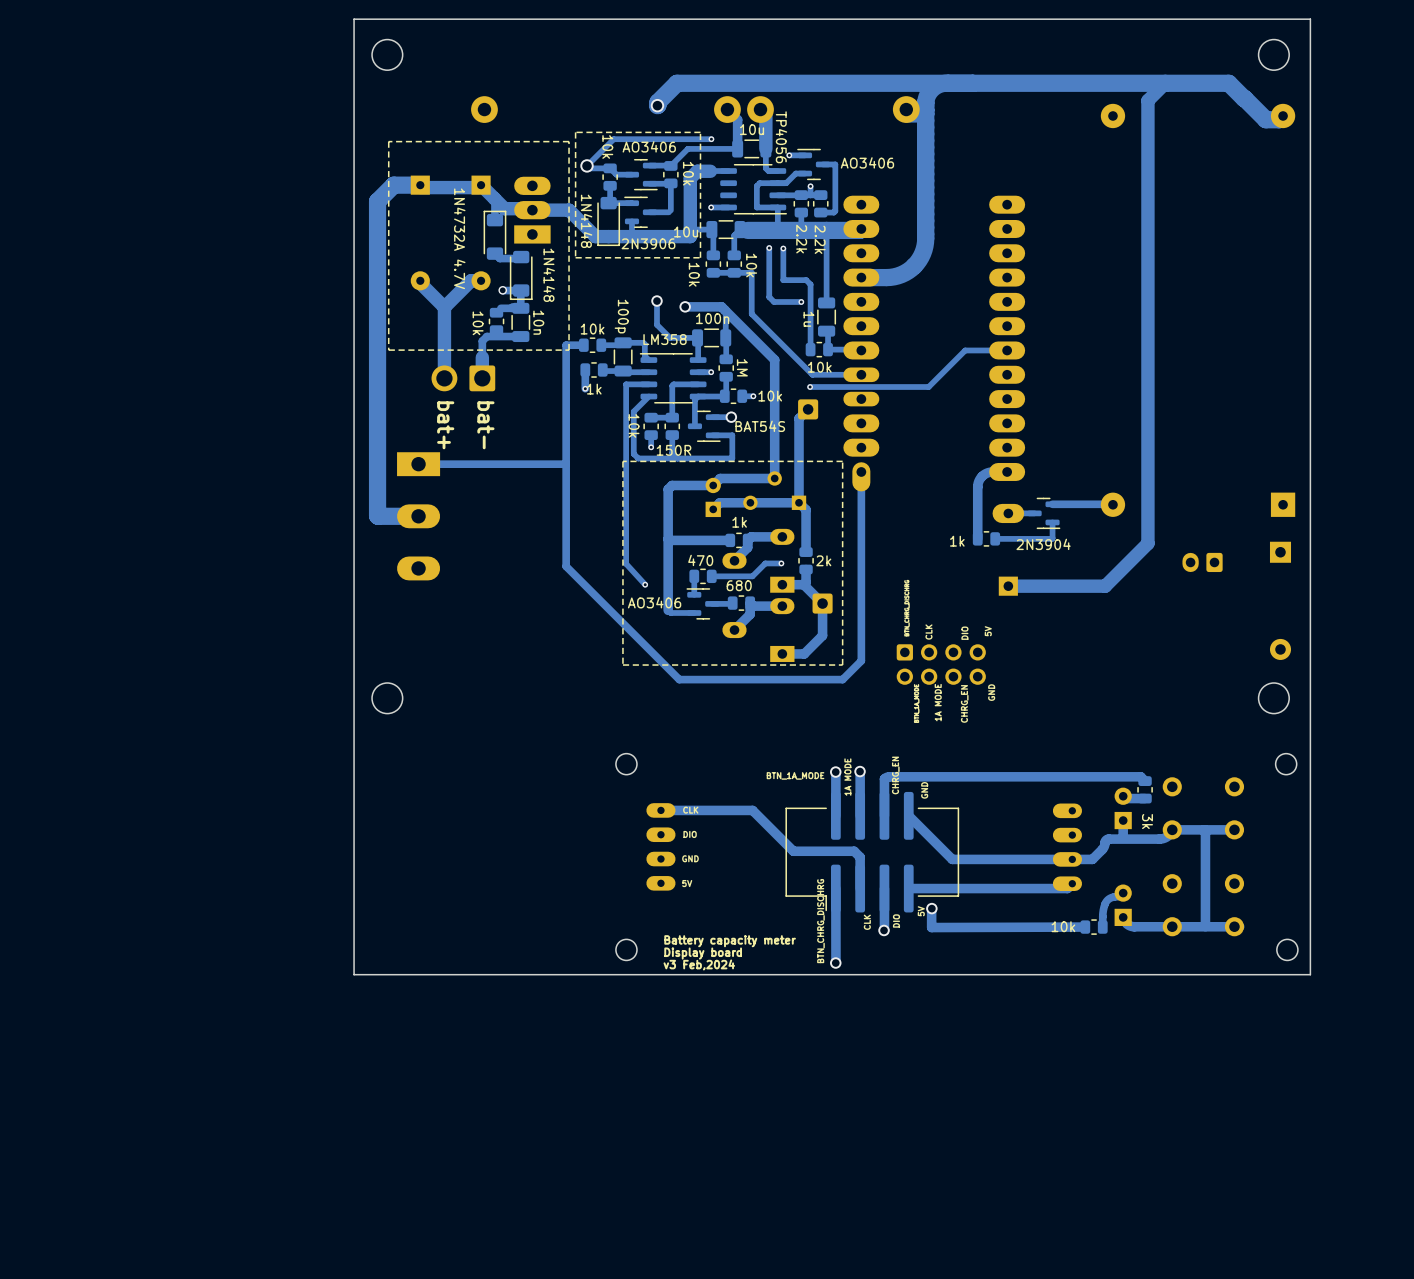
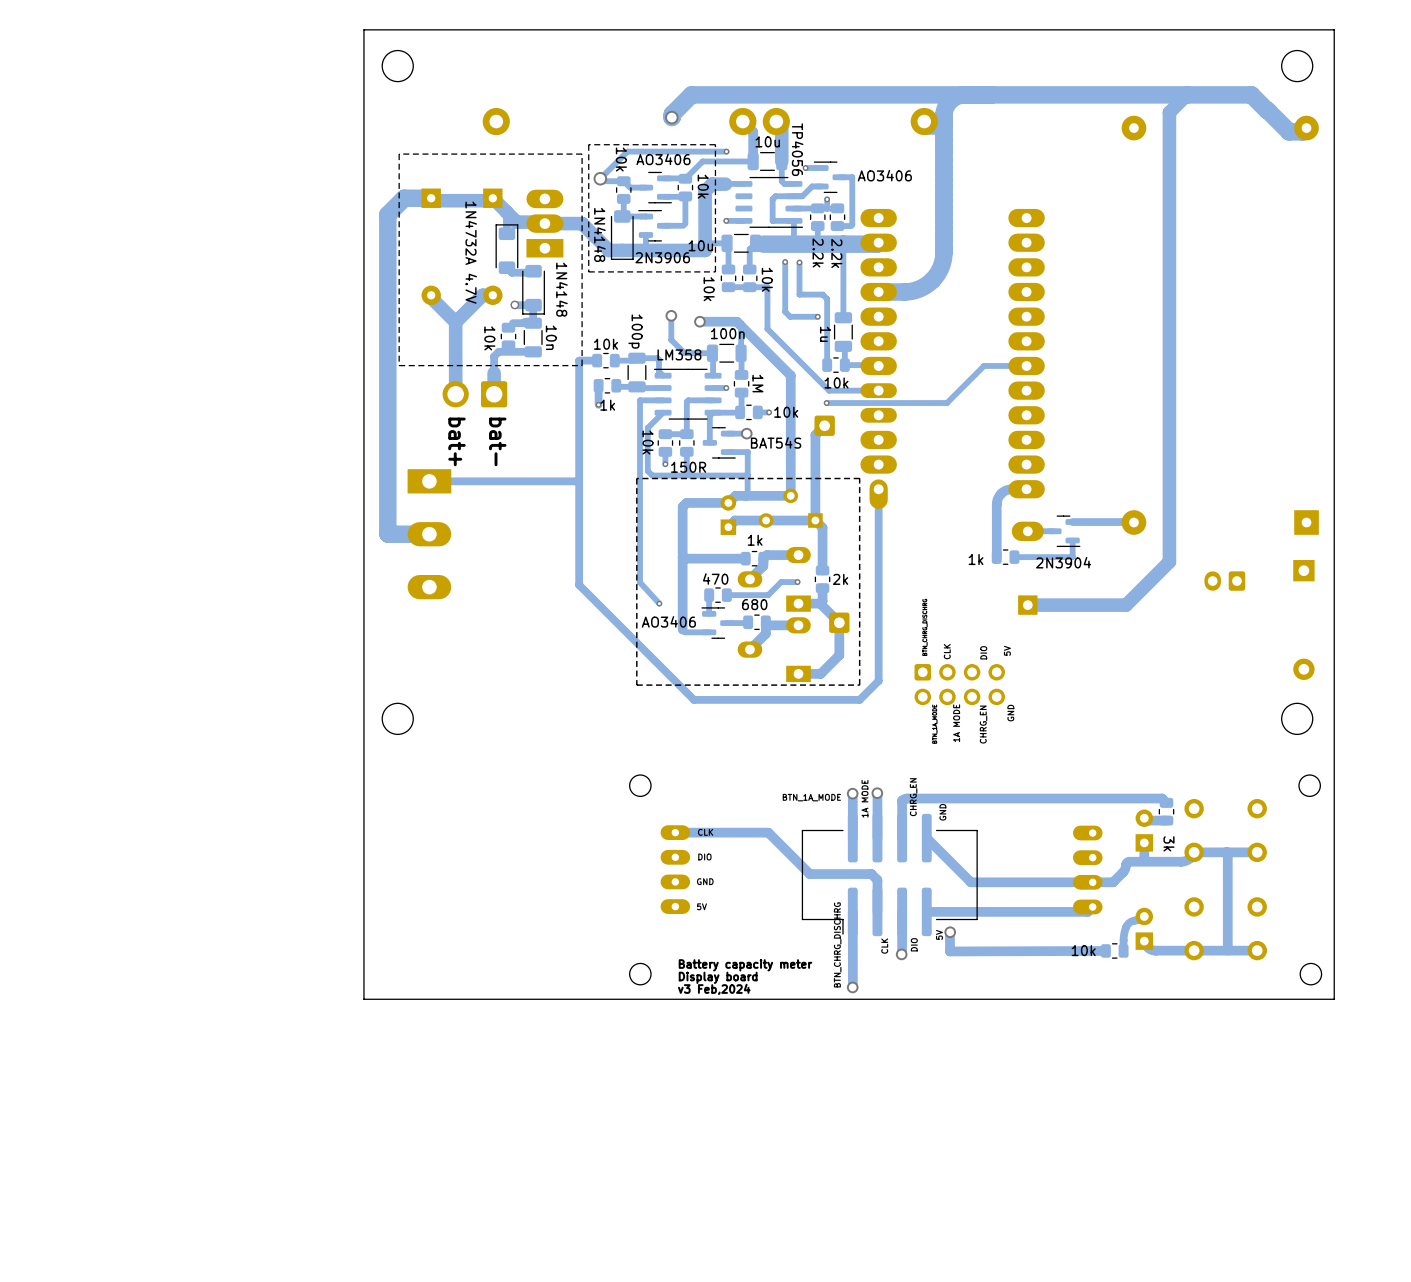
track: none -> (747, 475) (747, 494) (745, 495)

